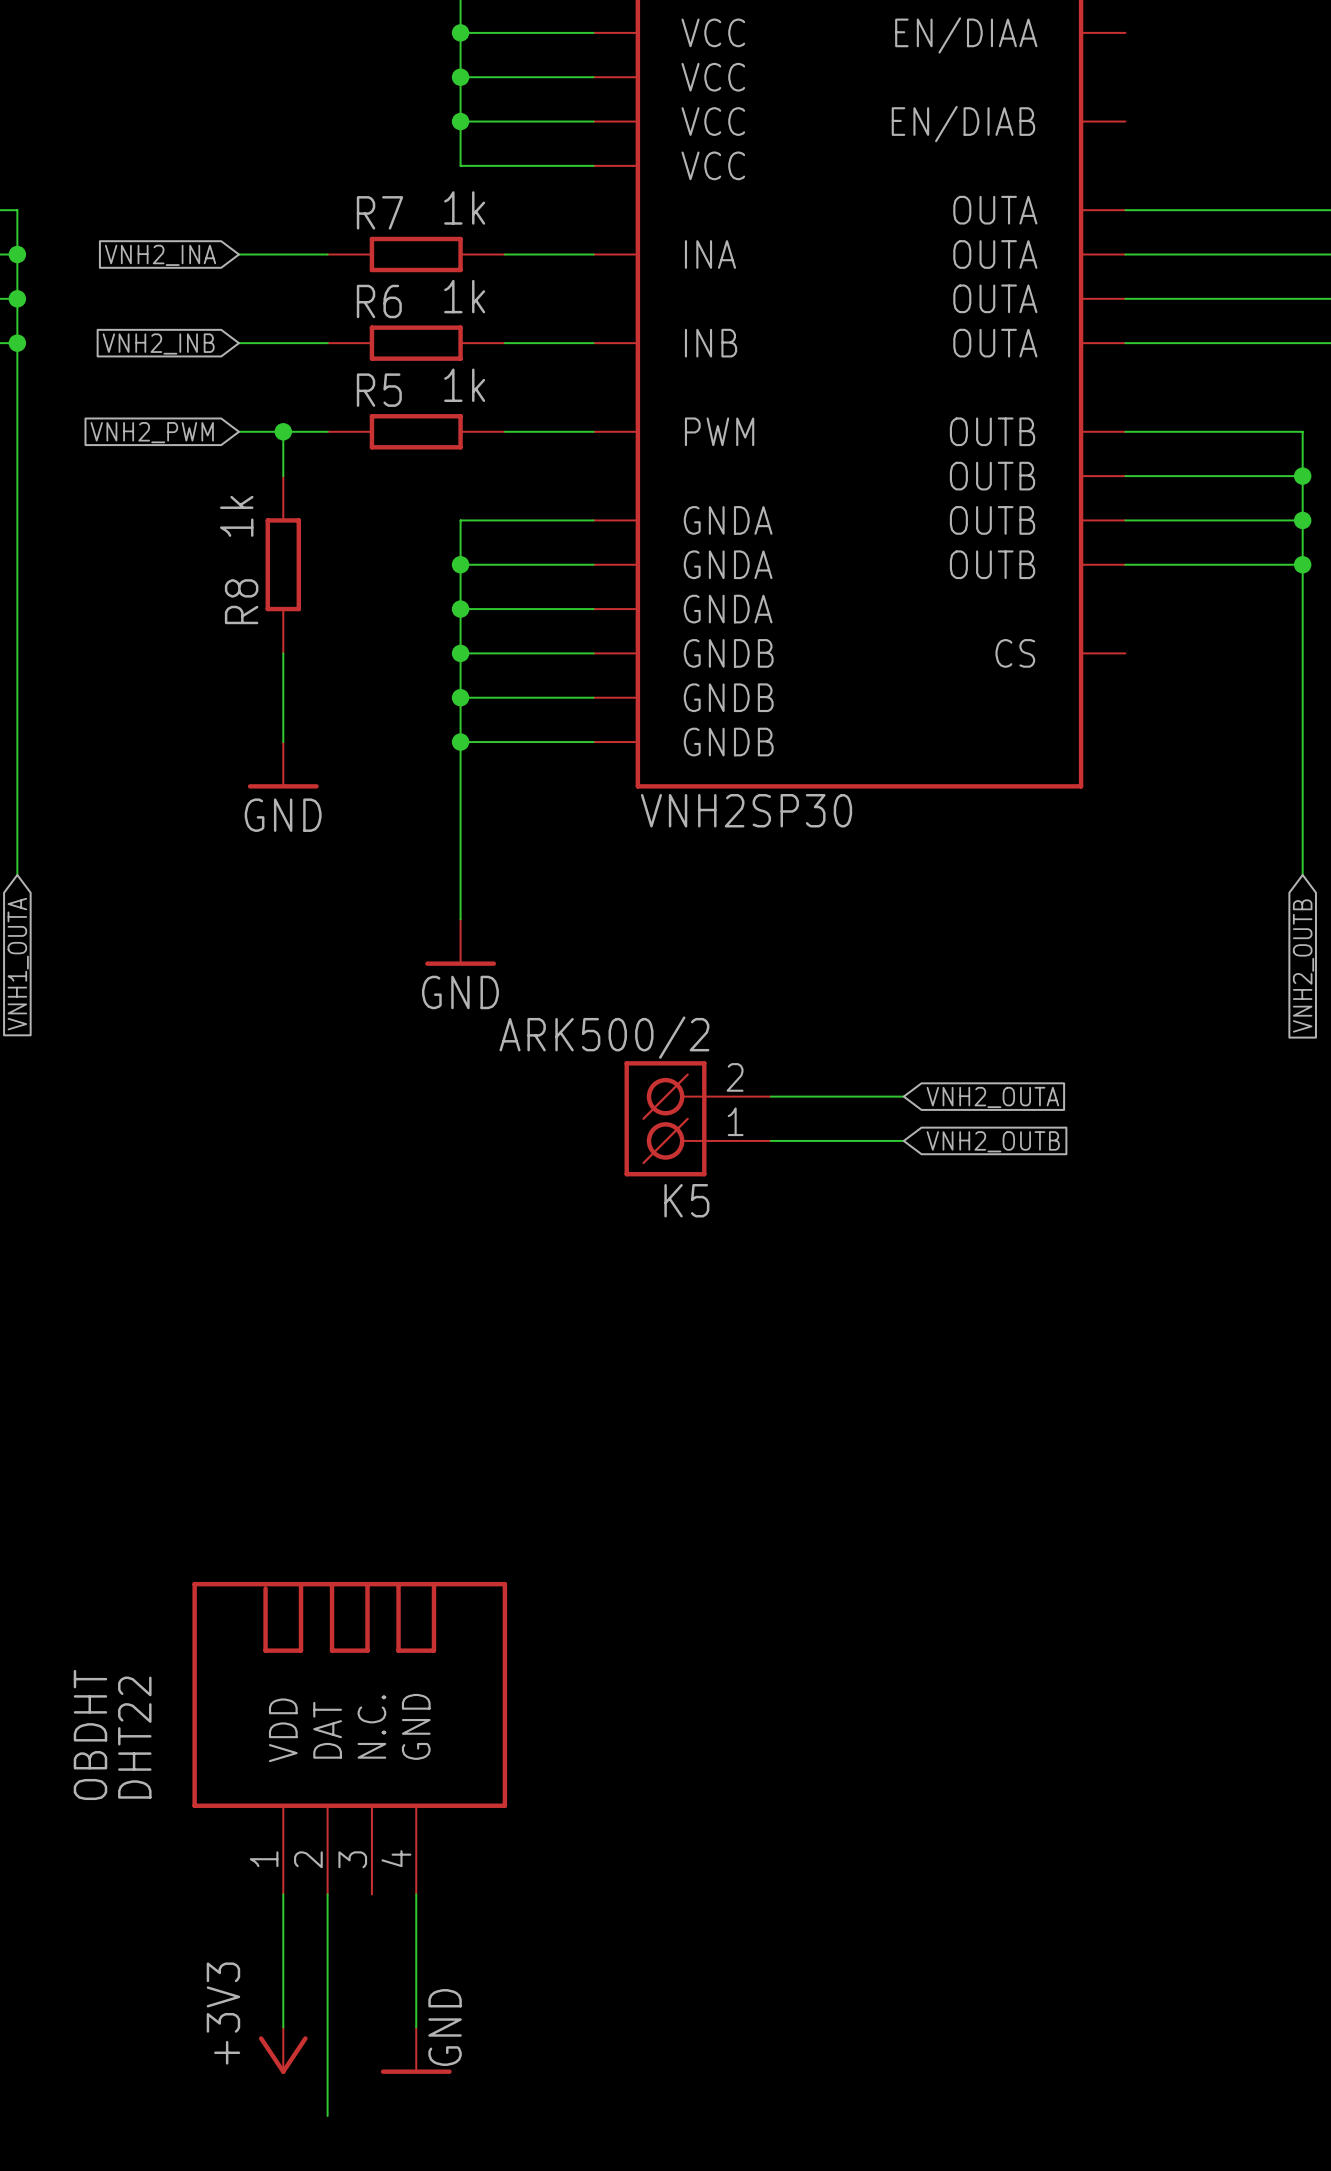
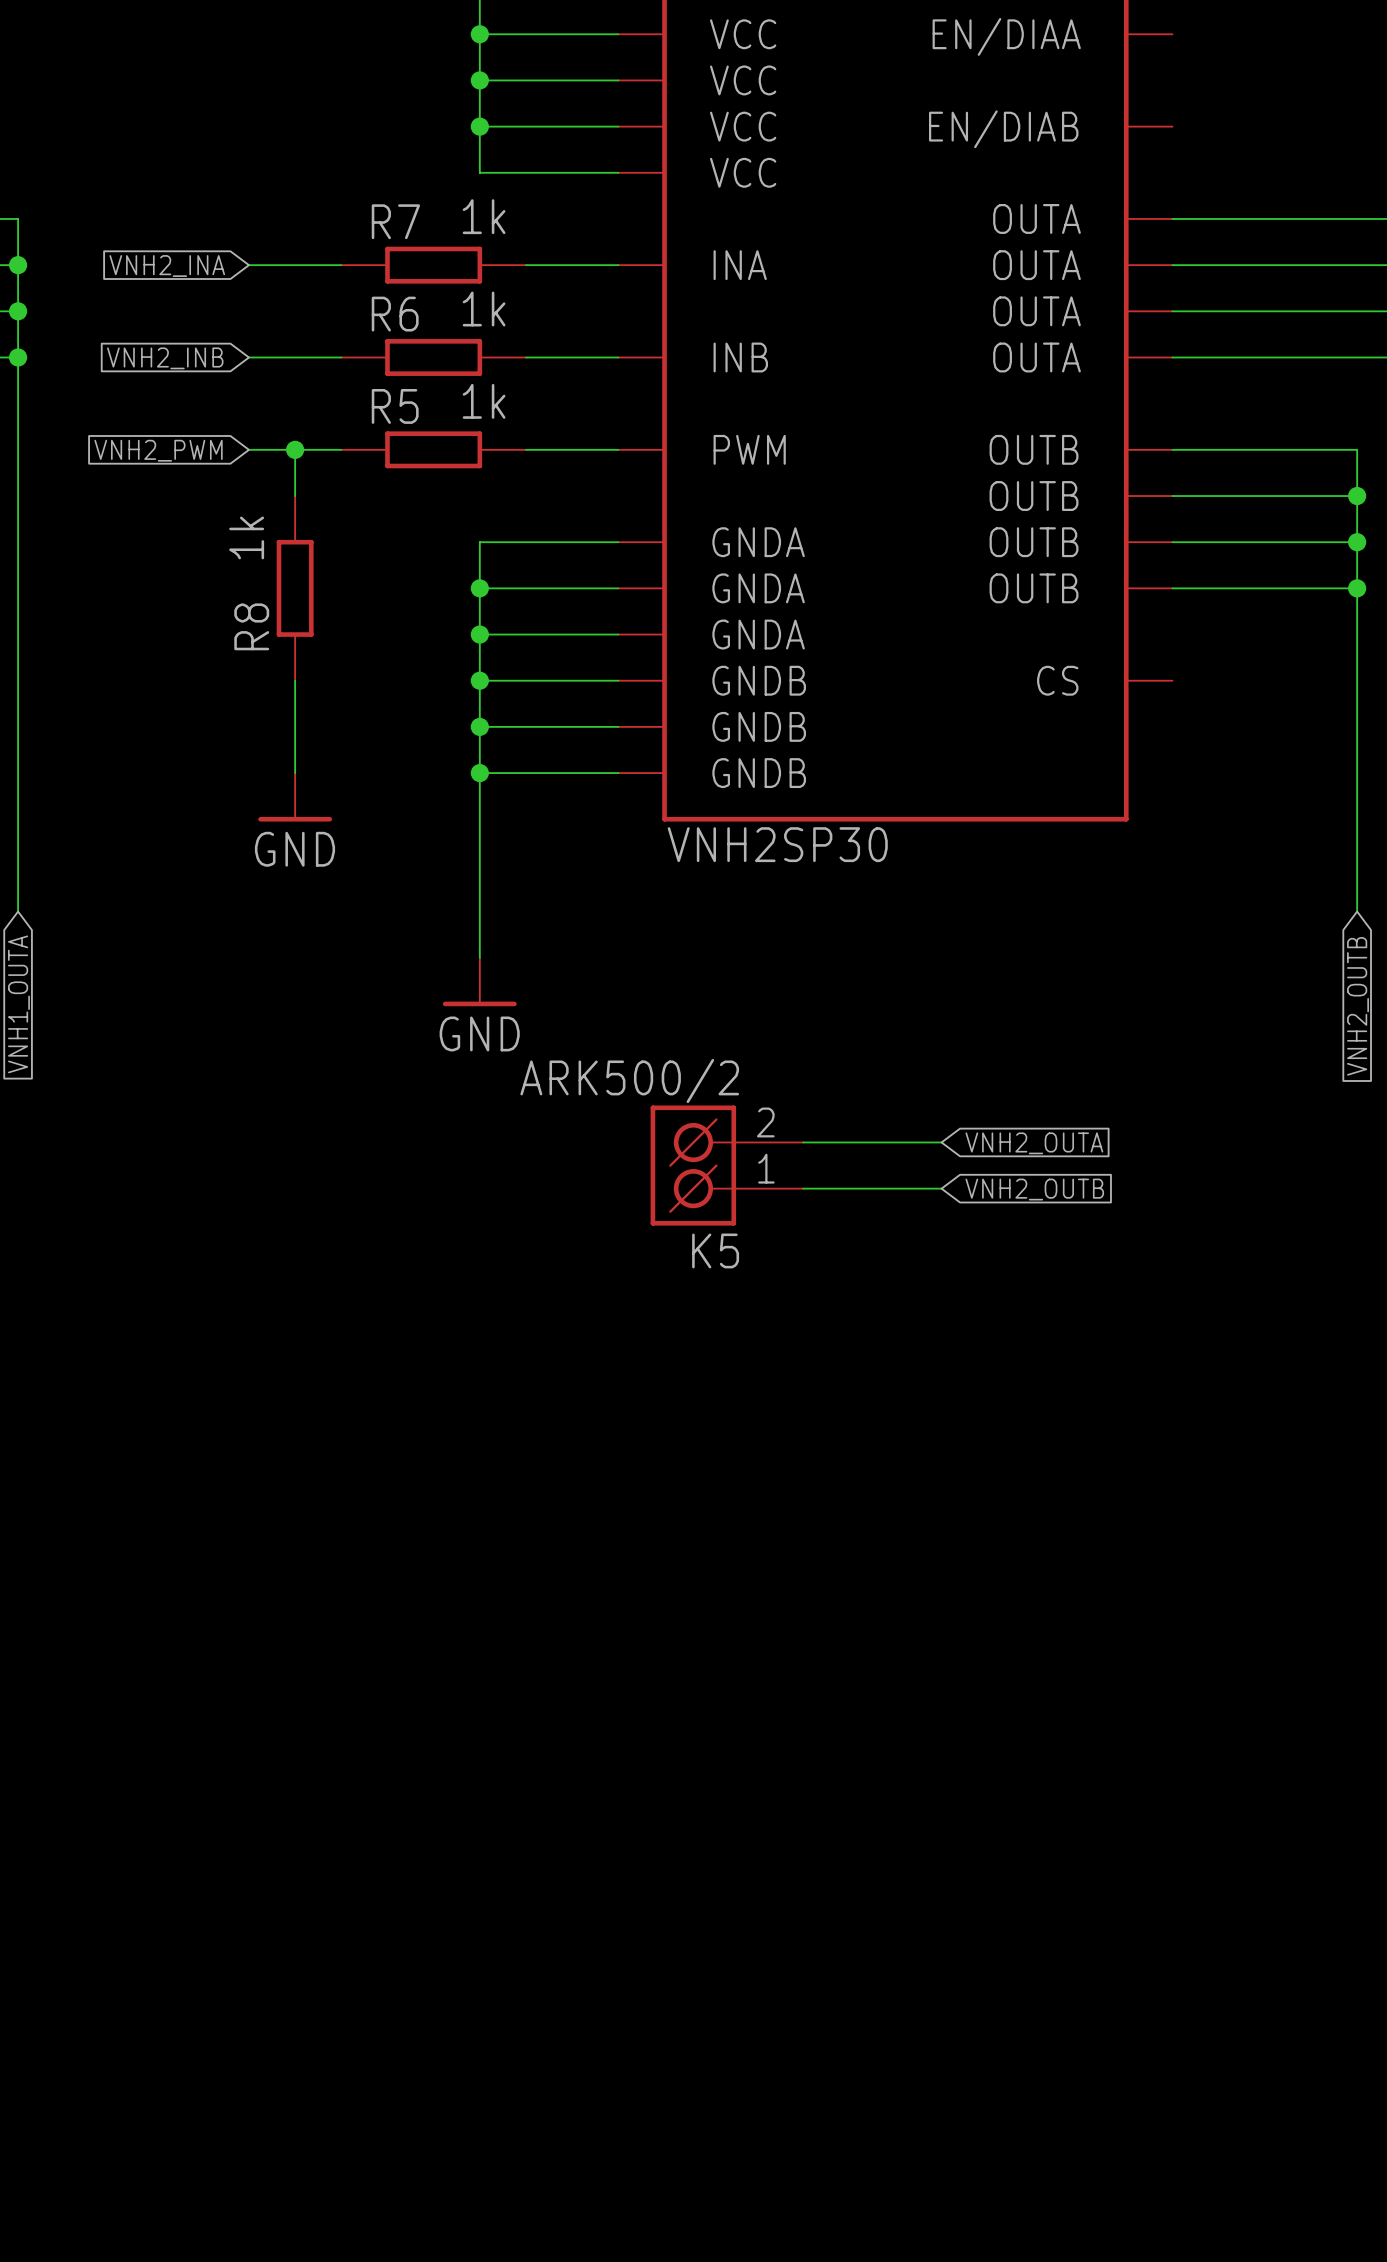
OBDHT: DHT22 (349, 1738) -> none
wire: (283, 1894) (283, 2027) -> none
wire: (327, 1894) (327, 2116) -> none
wire: (416, 1894) (416, 2027) -> none
power symbol: +3V3 (283, 2050) -> none
power symbol: GND (416, 2050) -> none

